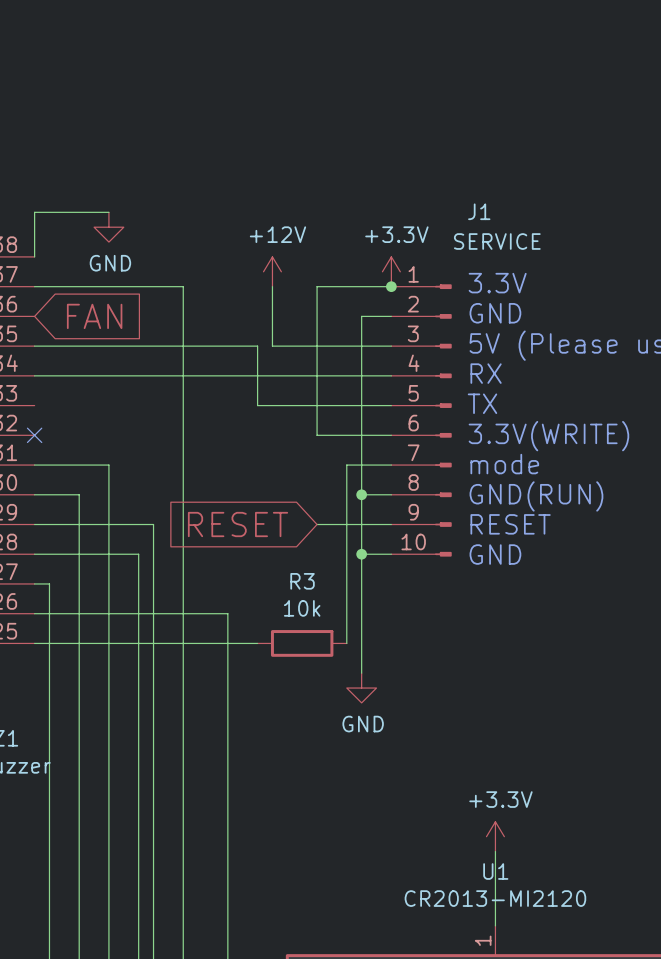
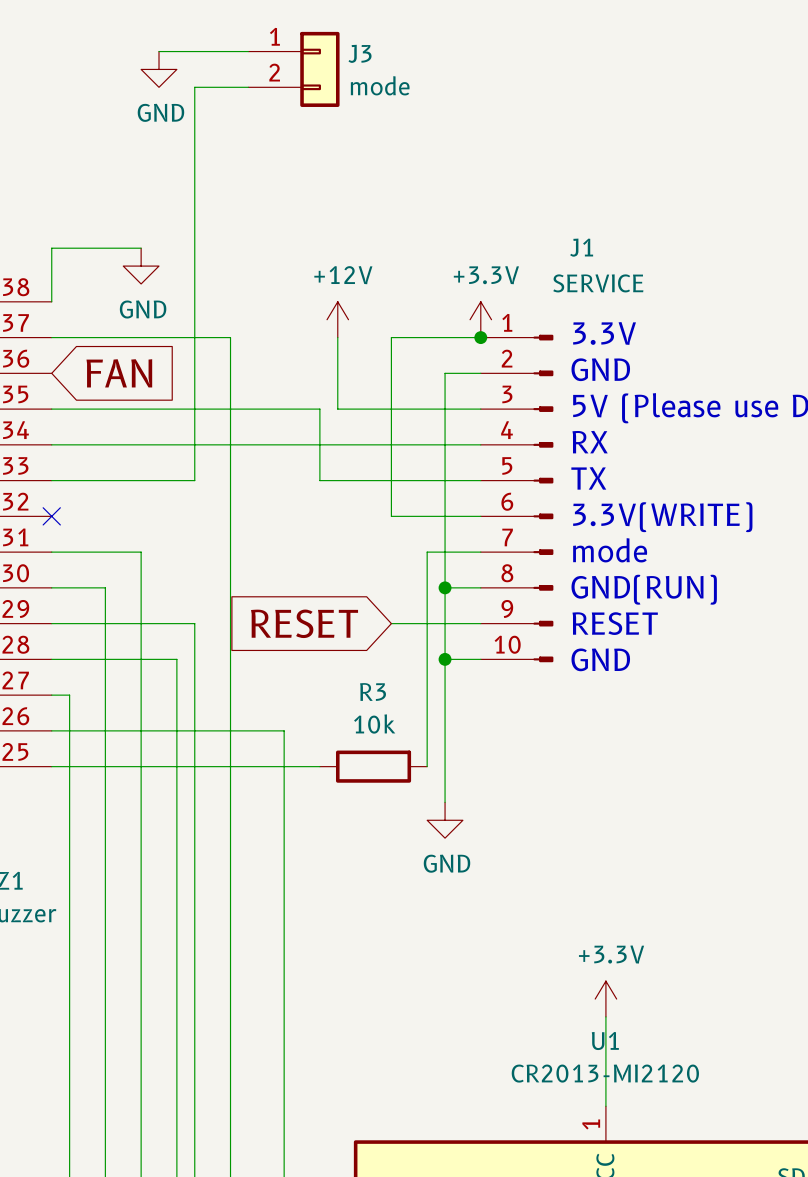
wire: none -> (159, 51) (248, 51)
power symbol: none -> GND (159, 69)
J3: none -> mode (293, 69)
wire: none -> (248, 87) (194, 87) (194, 480) (51, 480)

